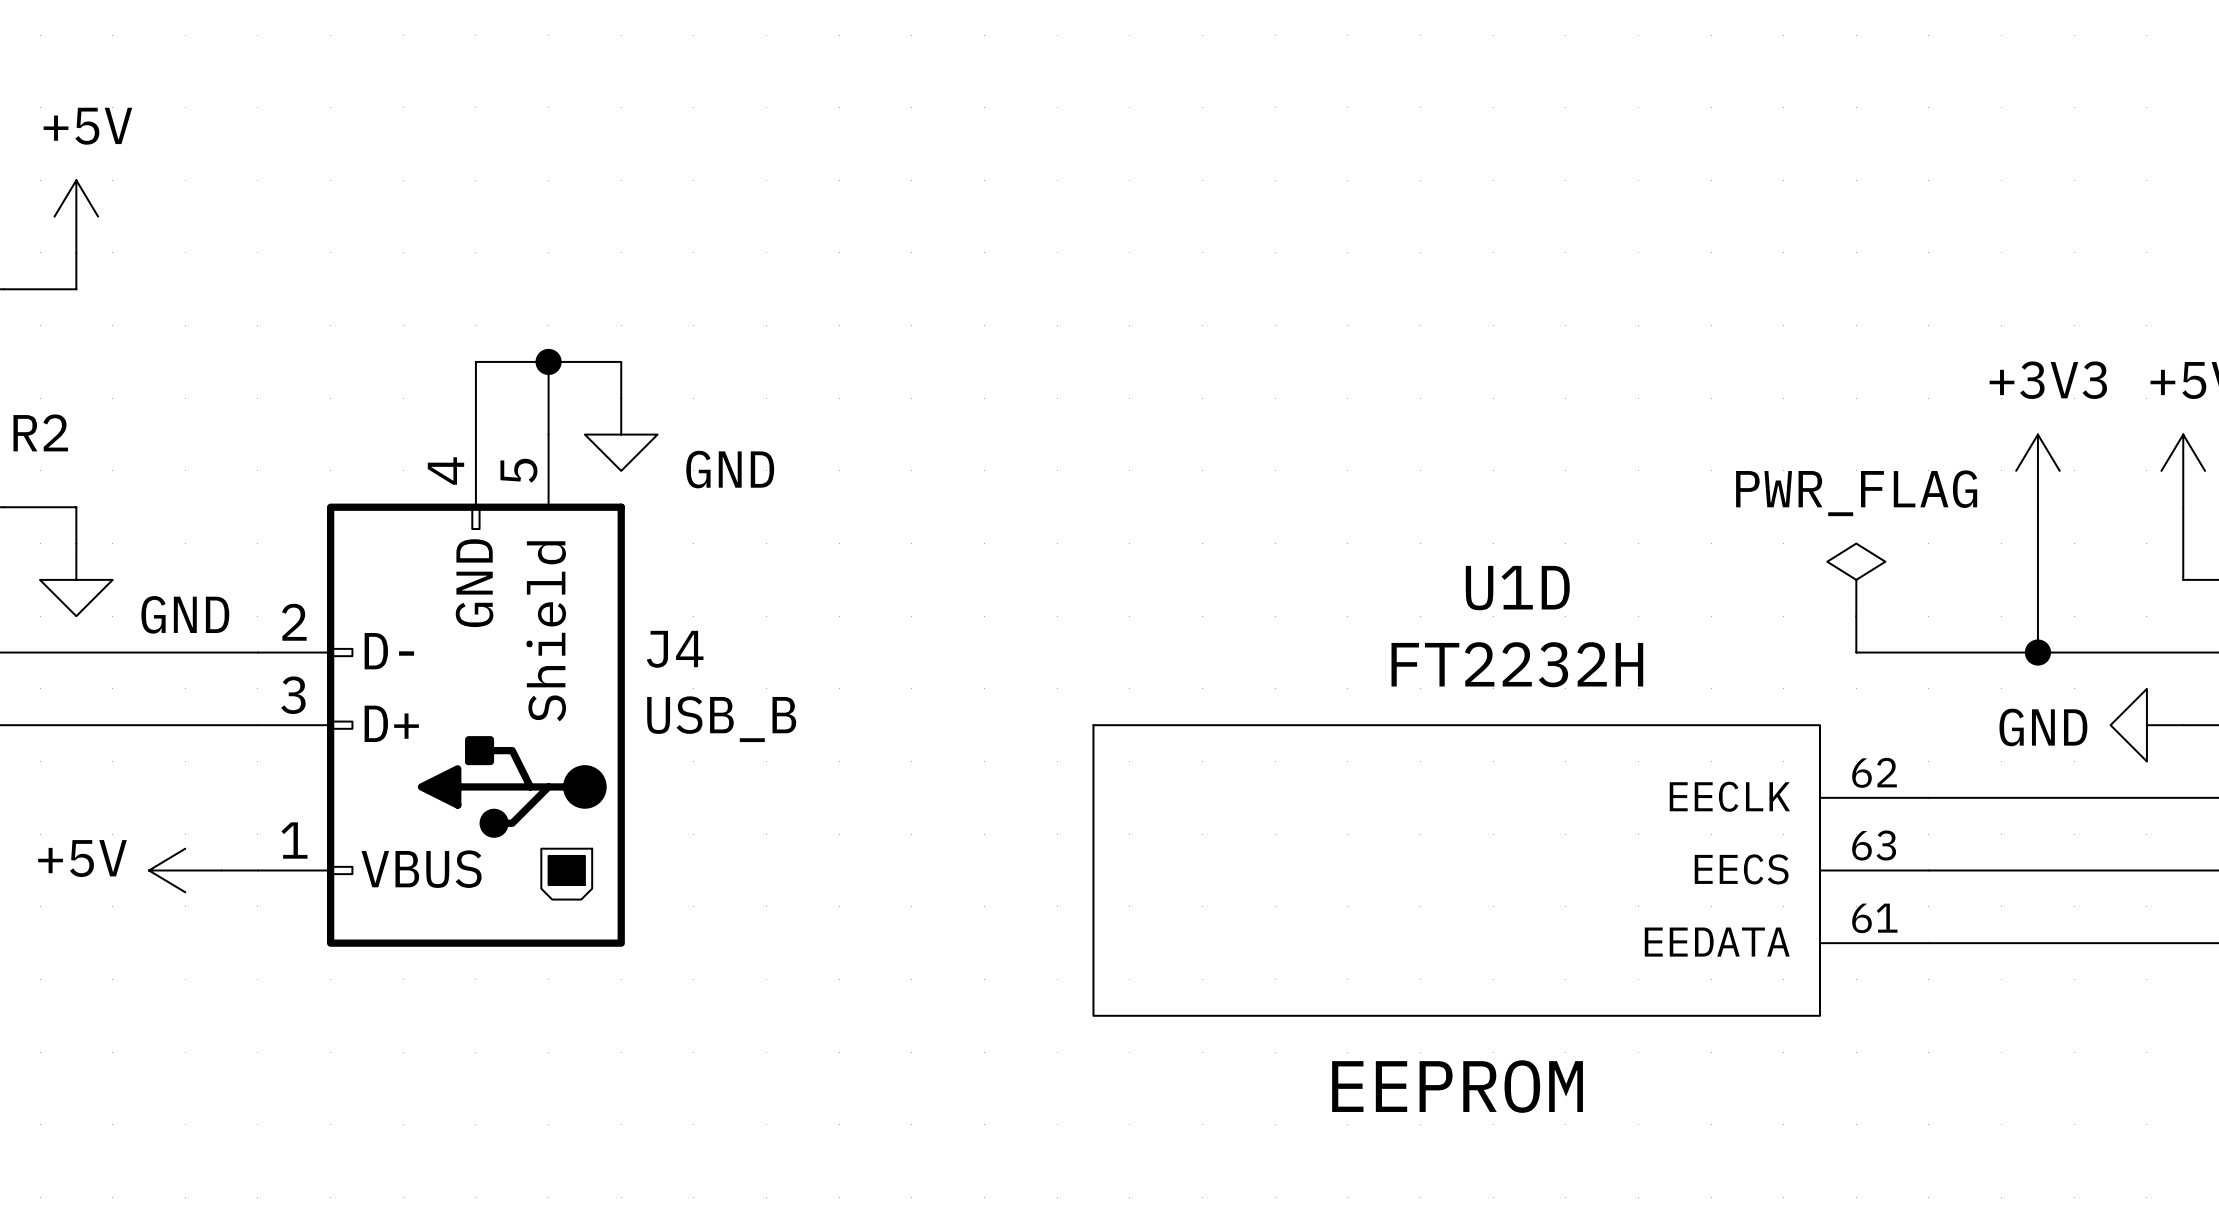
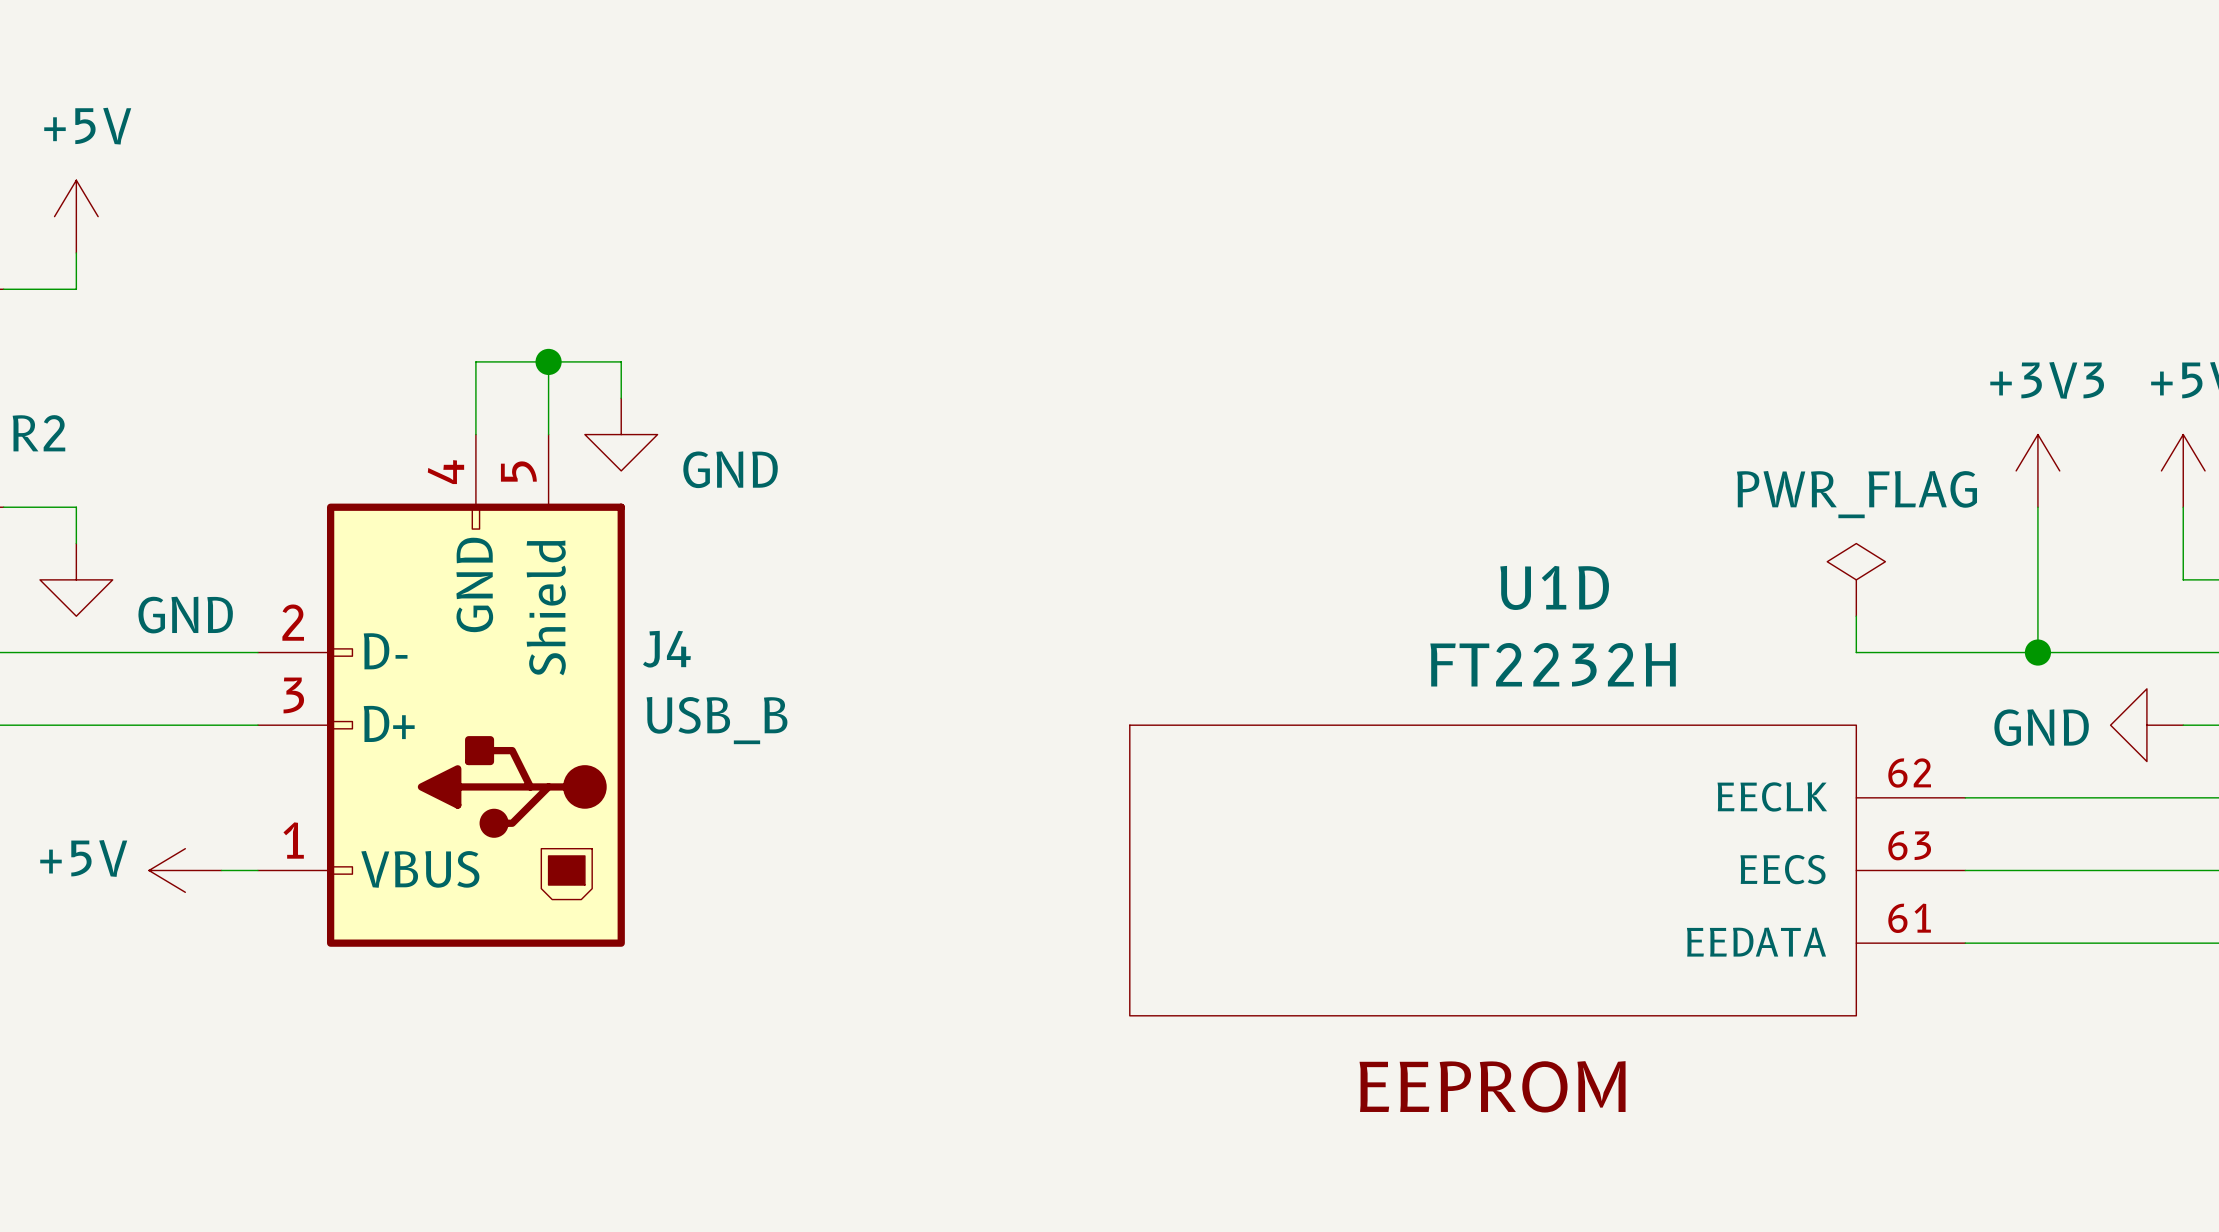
U1D position: (1511, 870) -> (1547, 870)

